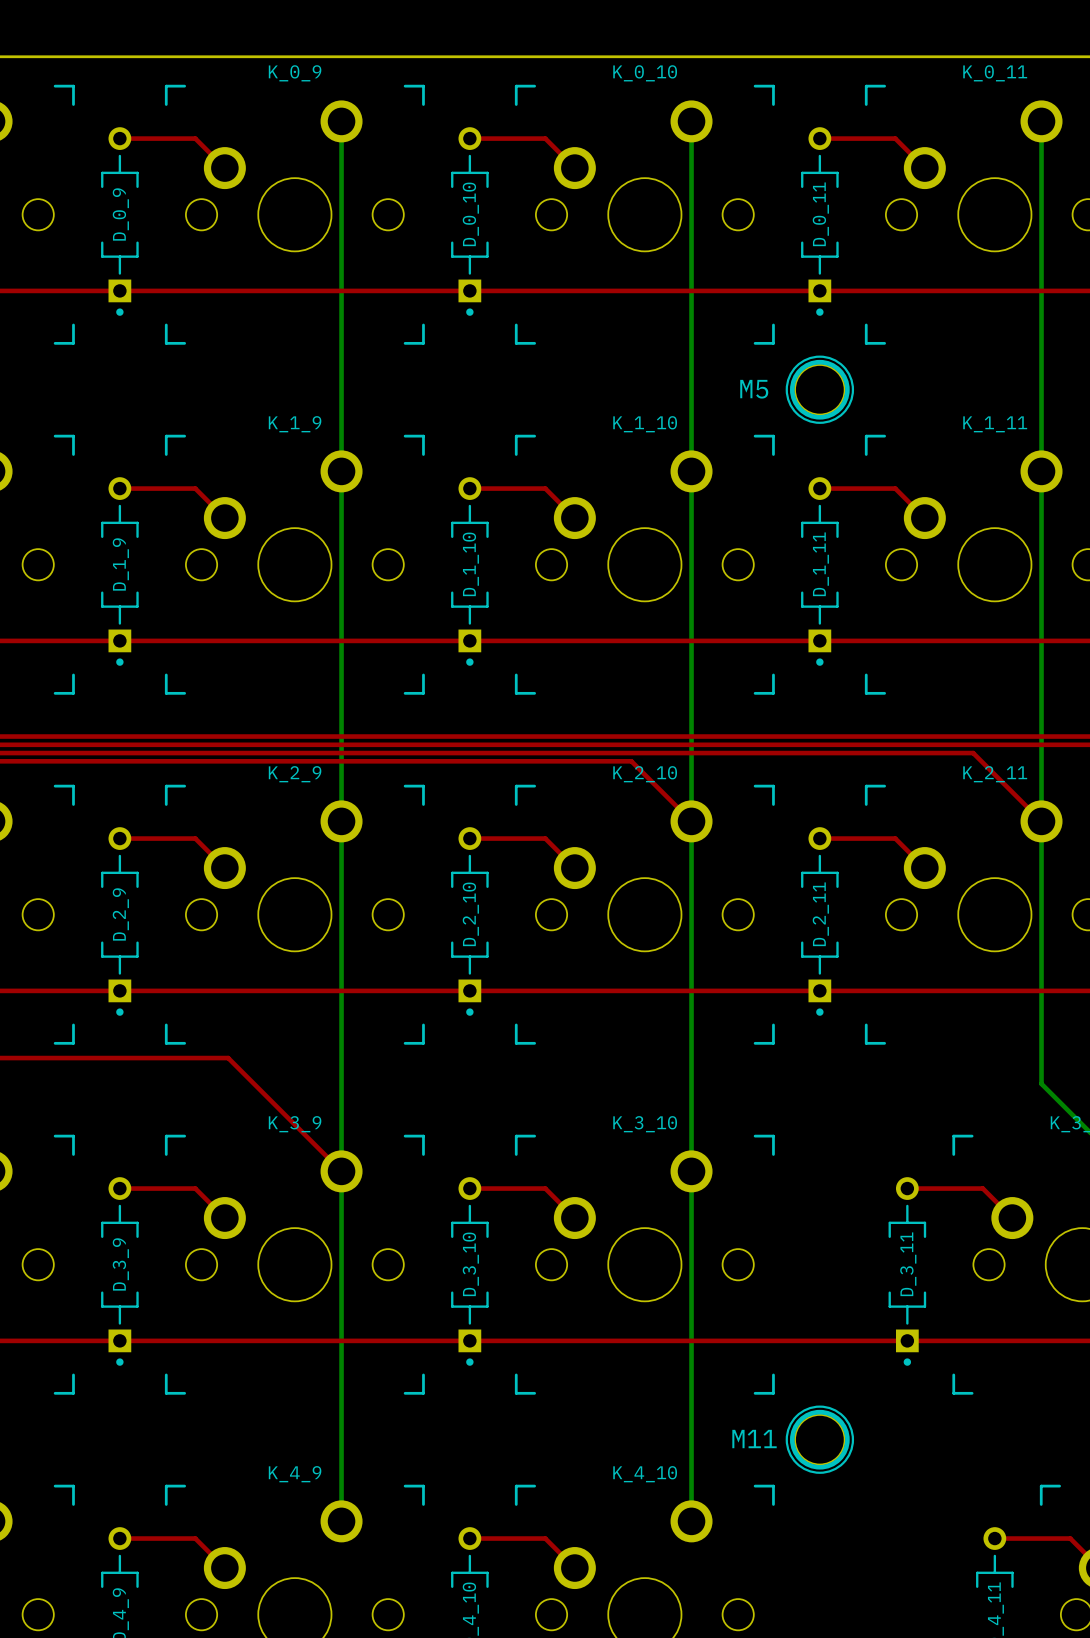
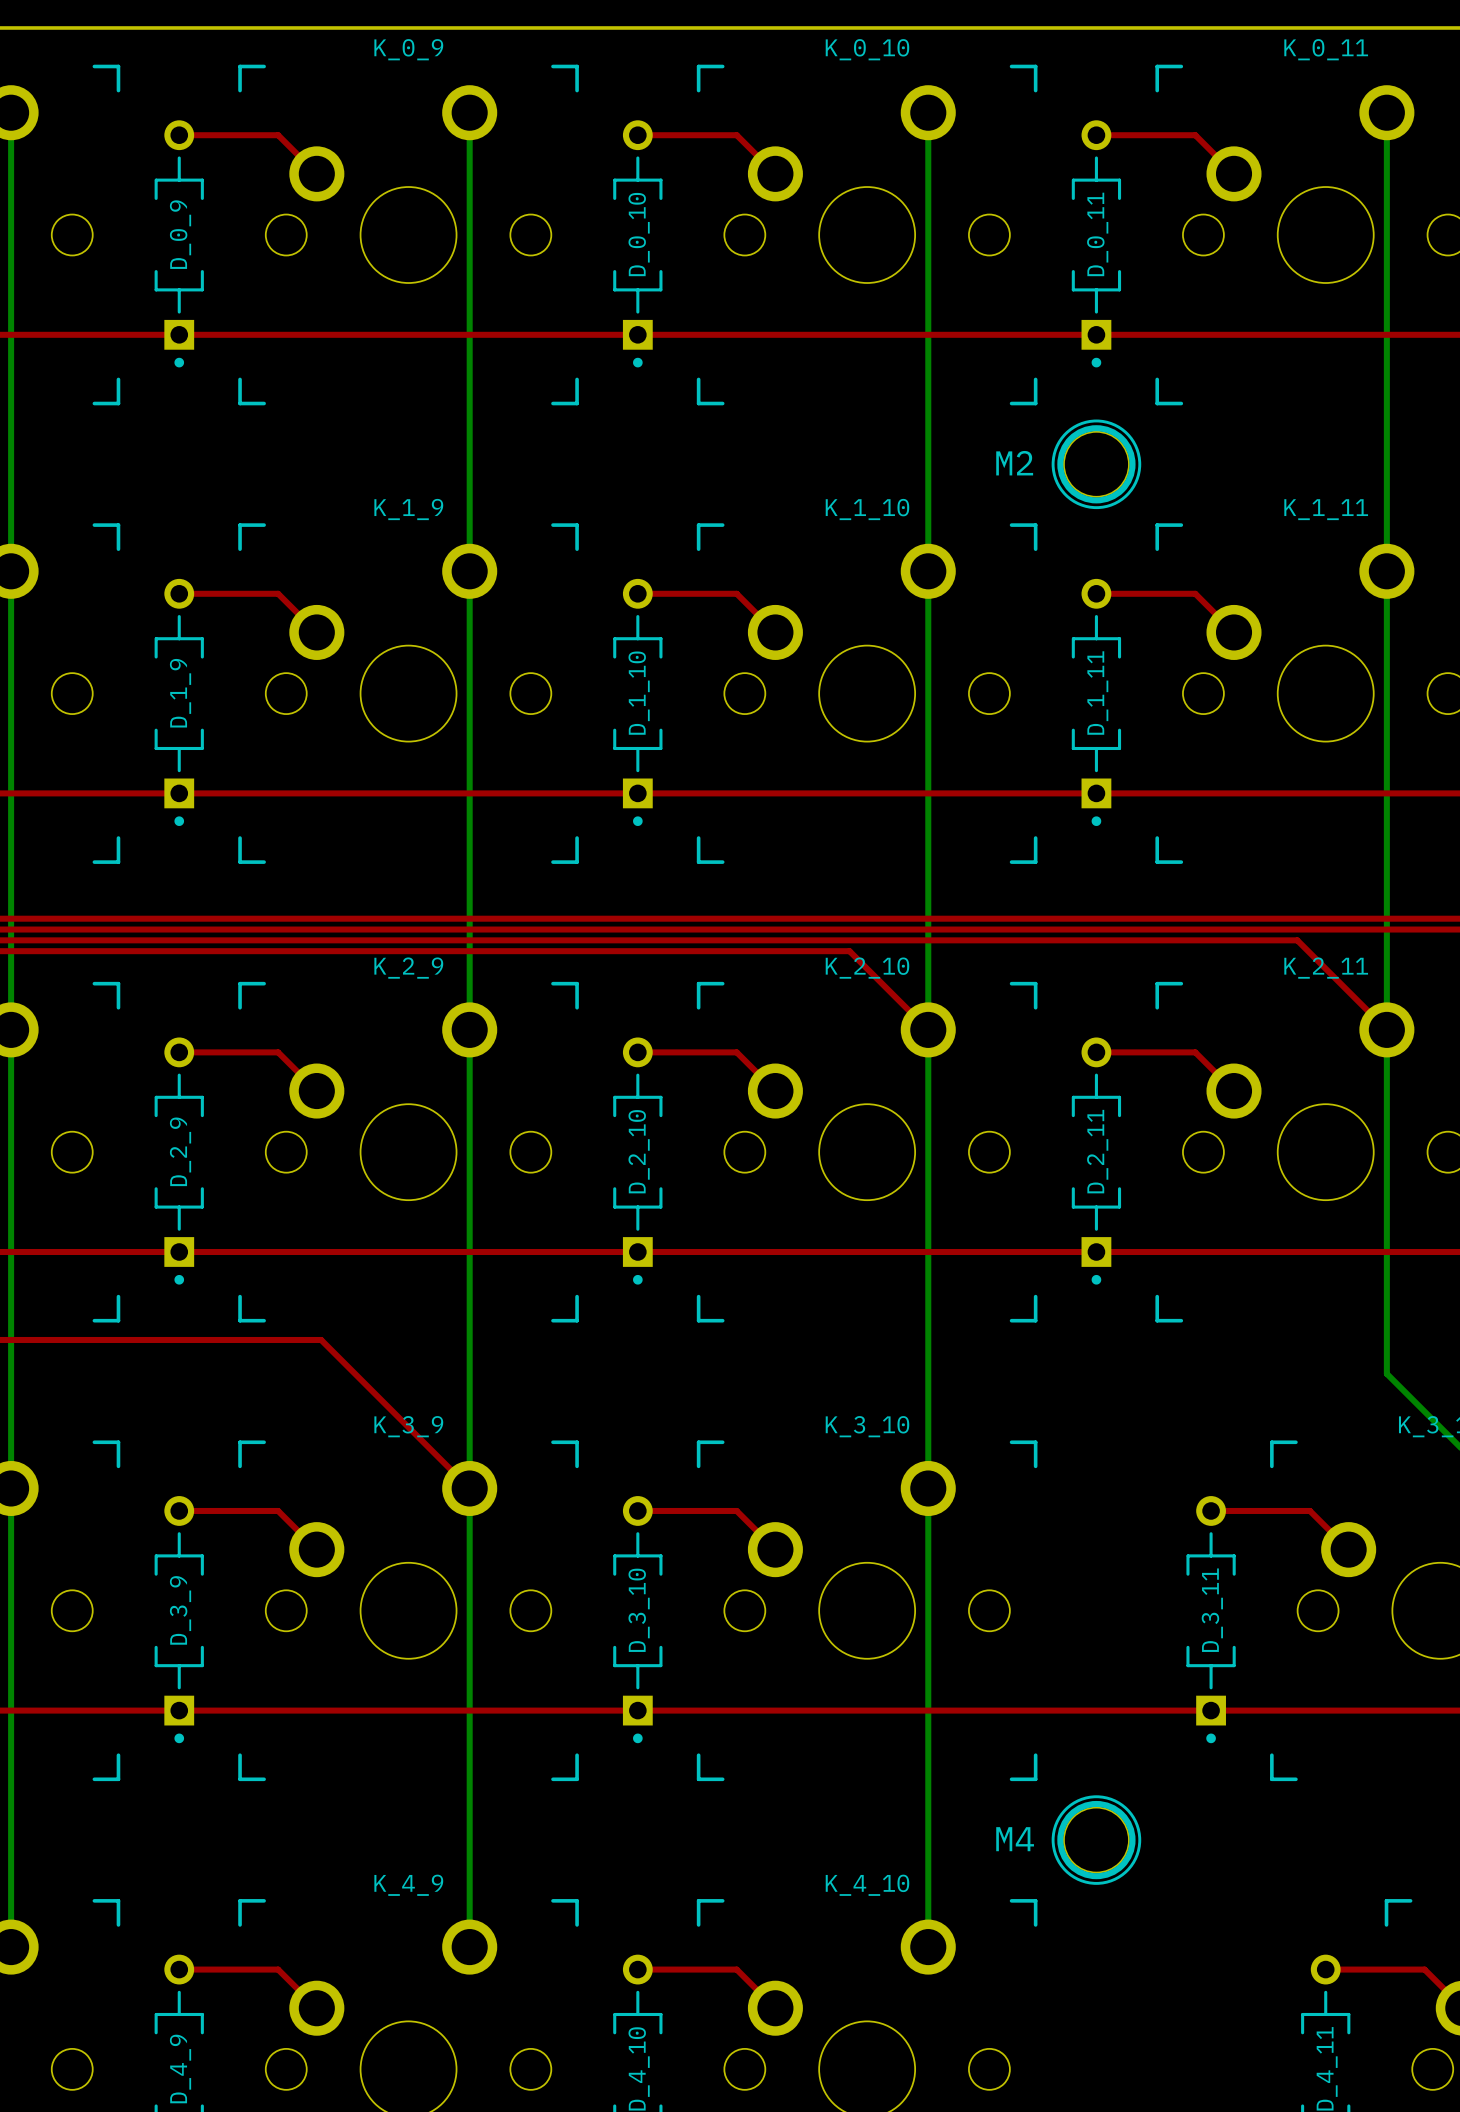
M5 name: M5 (754, 389) -> M2 (1014, 463)
M11 name: M11 (754, 1439) -> M4 (1015, 1839)

